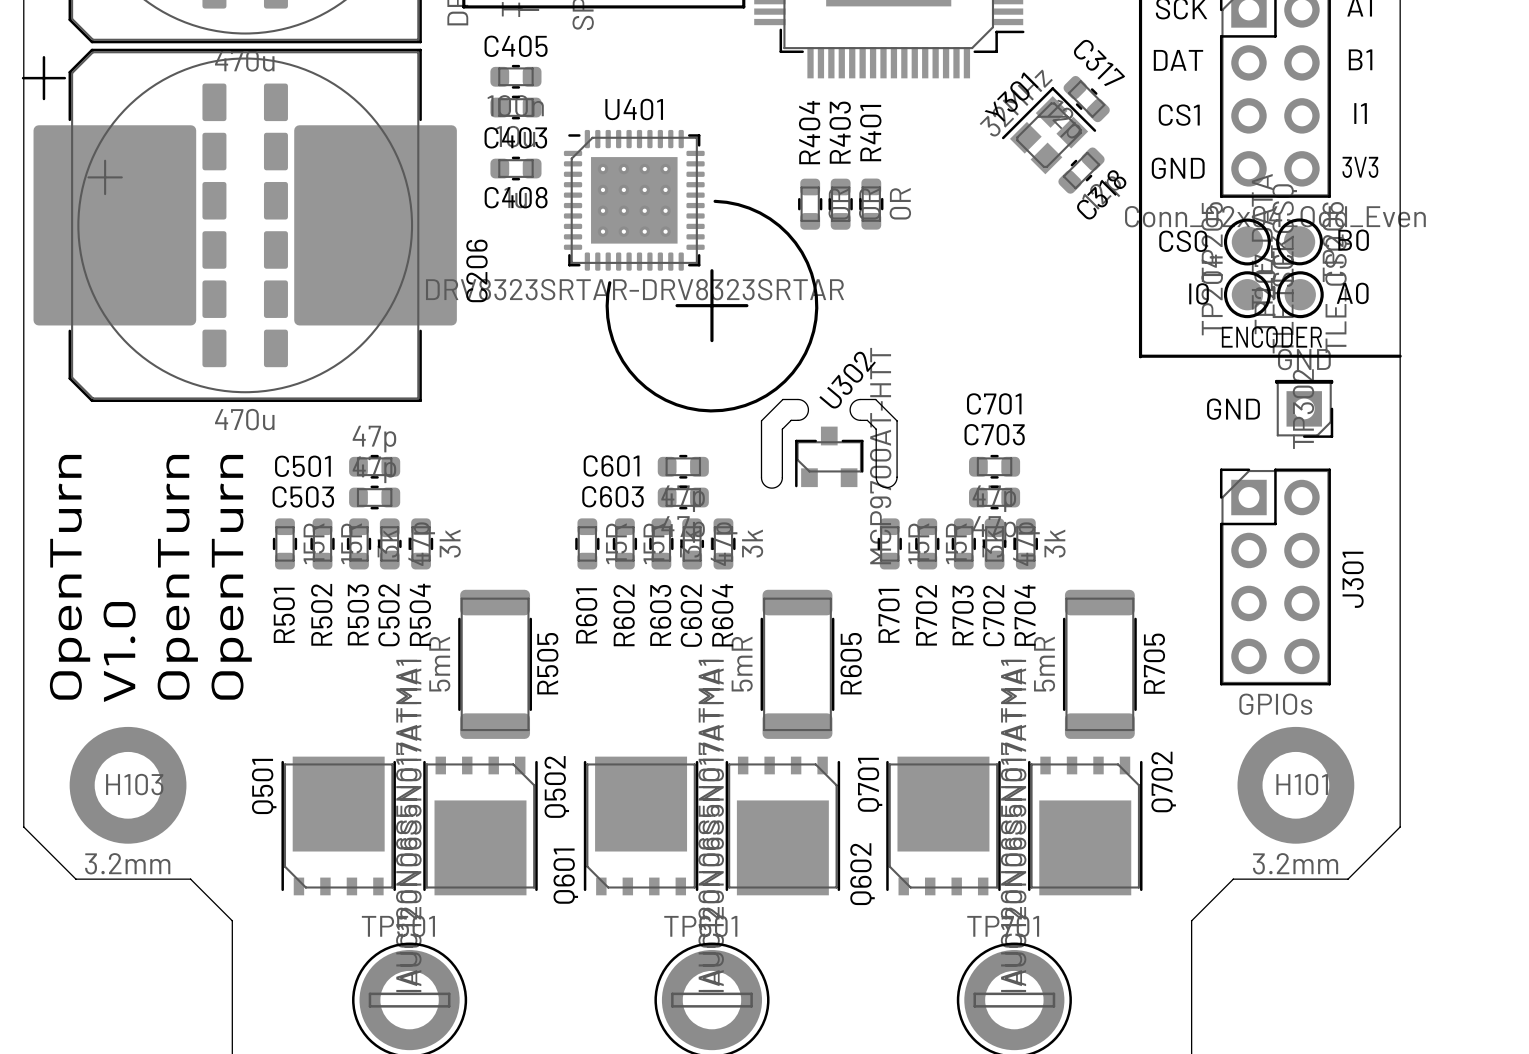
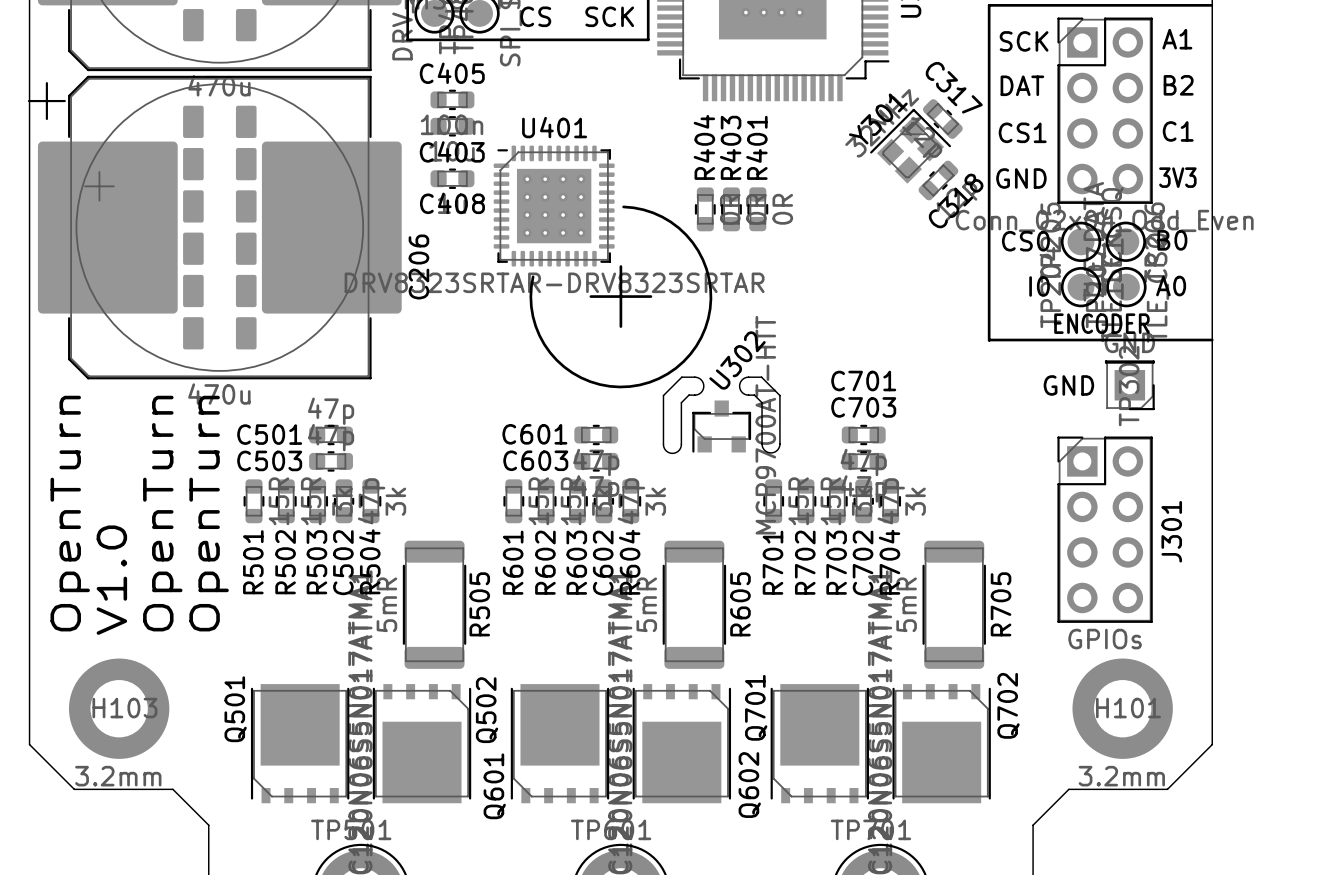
text: B1 (1360, 59) -> B2 (1178, 85)
text: I1 (1360, 113) -> C1 (1178, 131)

